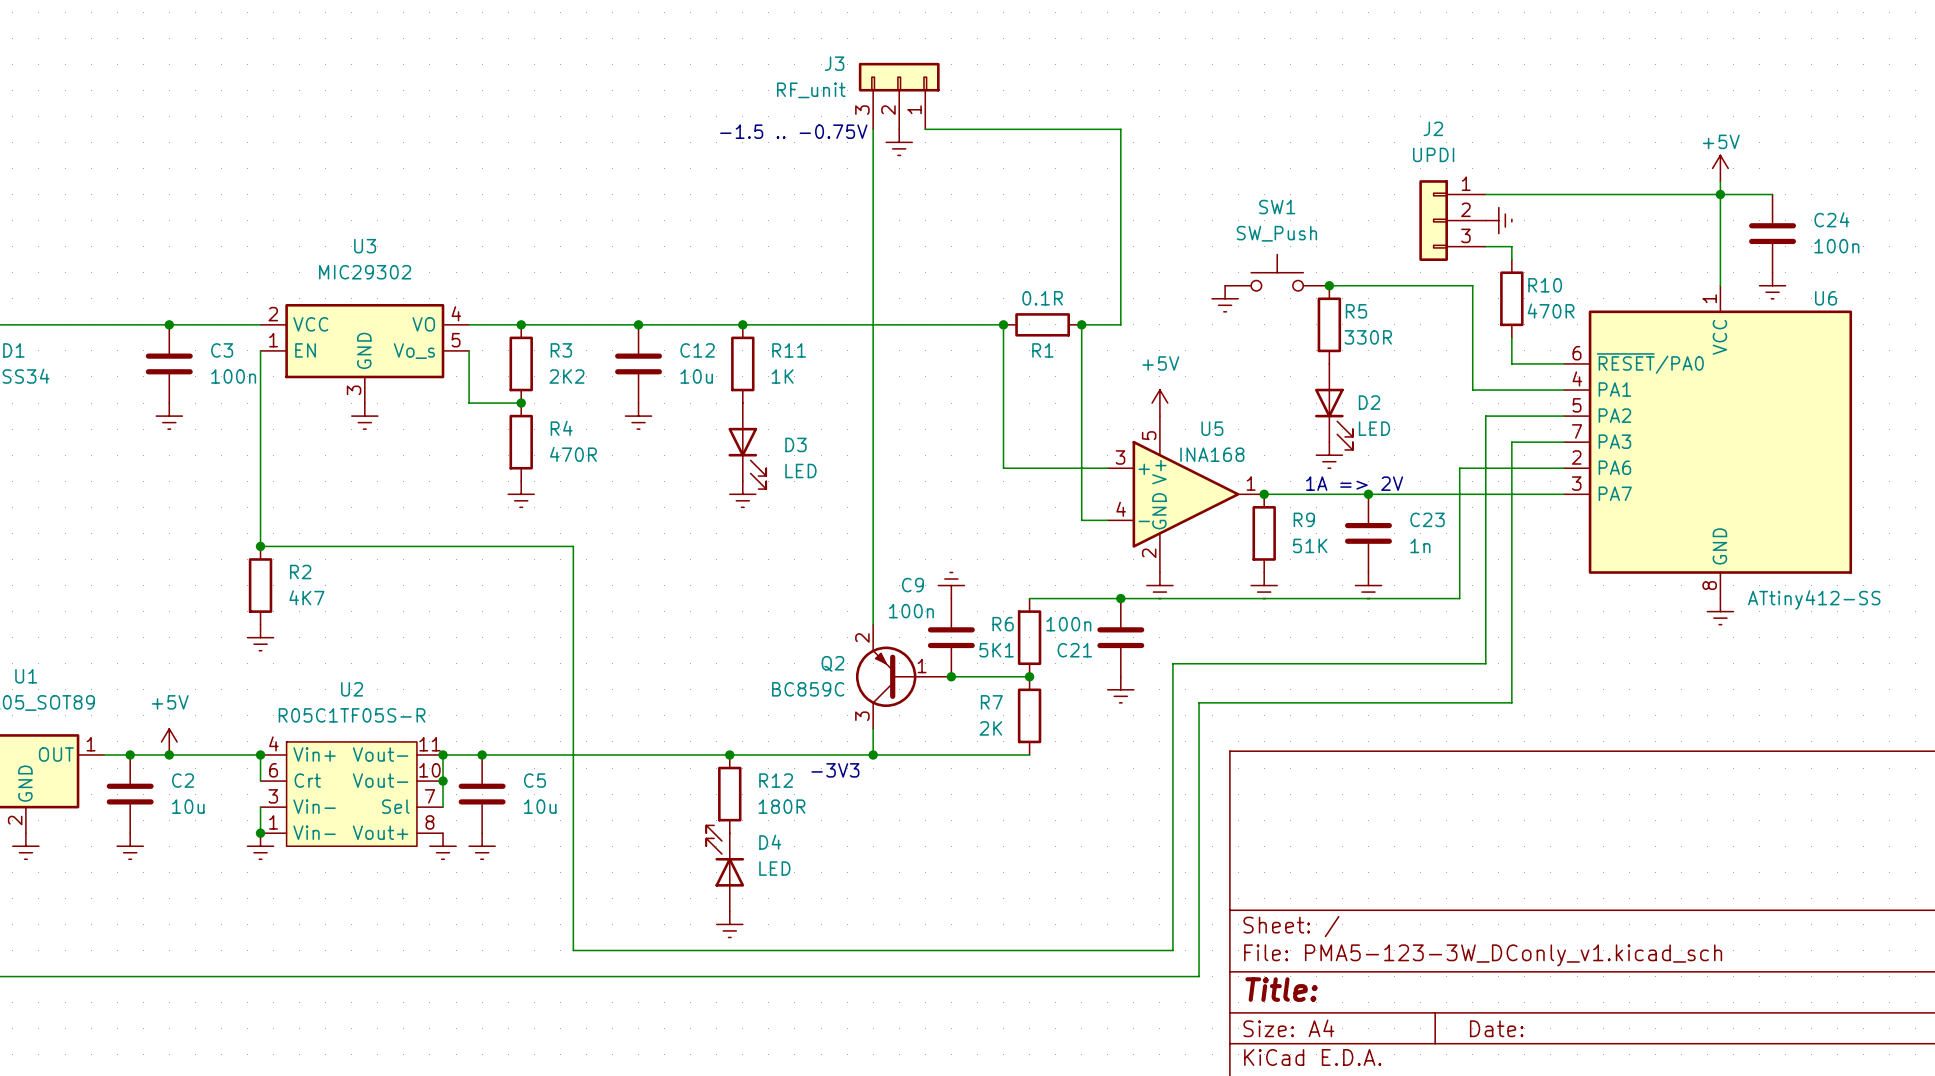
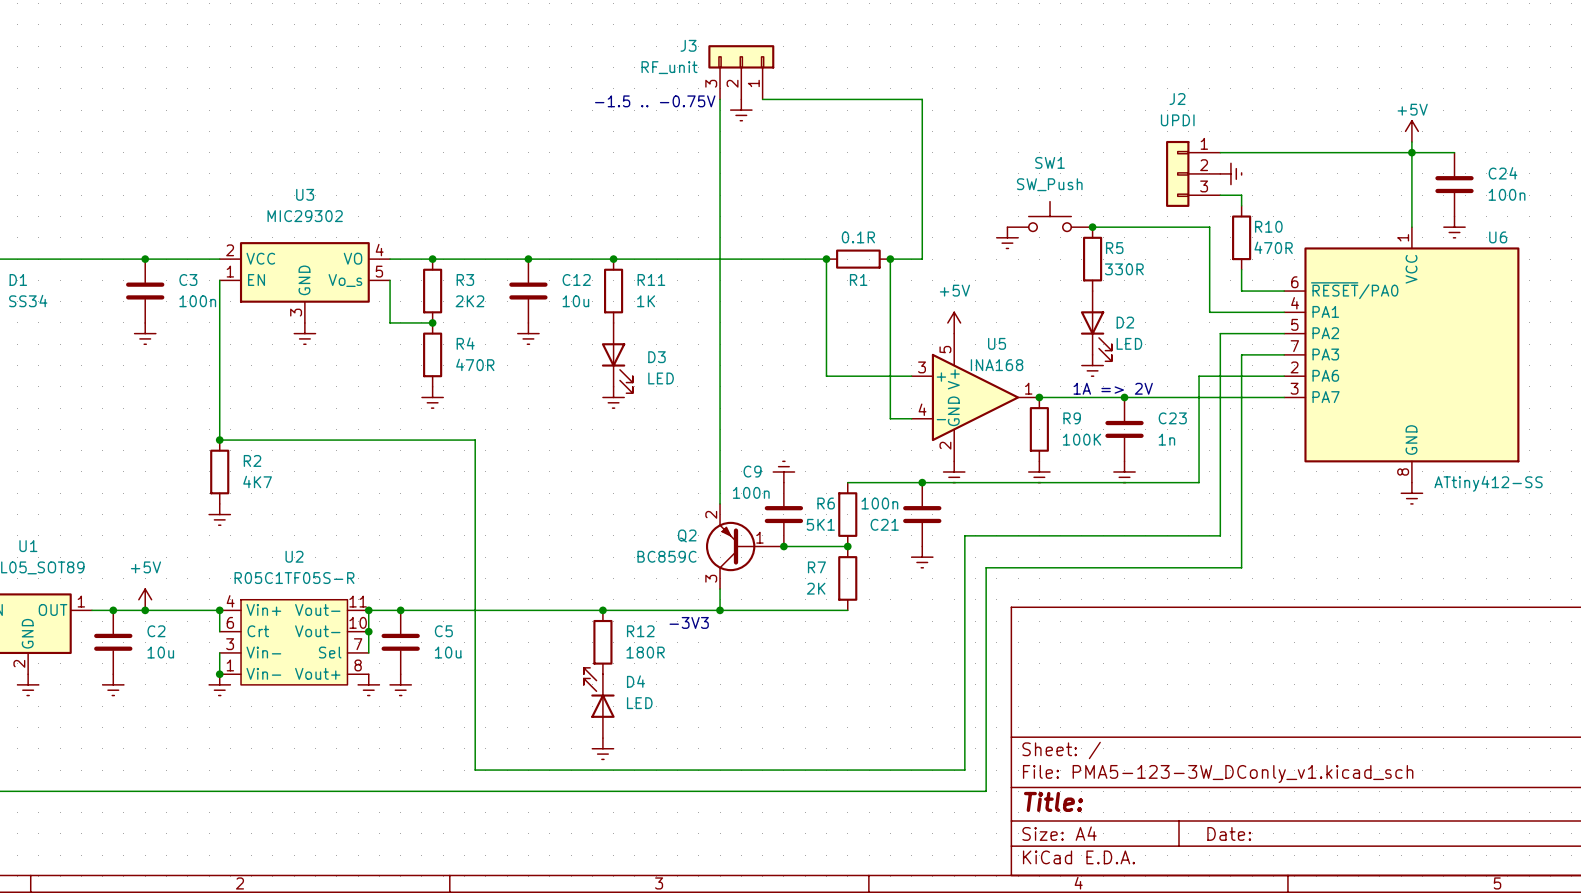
R9 value: 51K (1310, 545) -> 100K (1082, 439)

